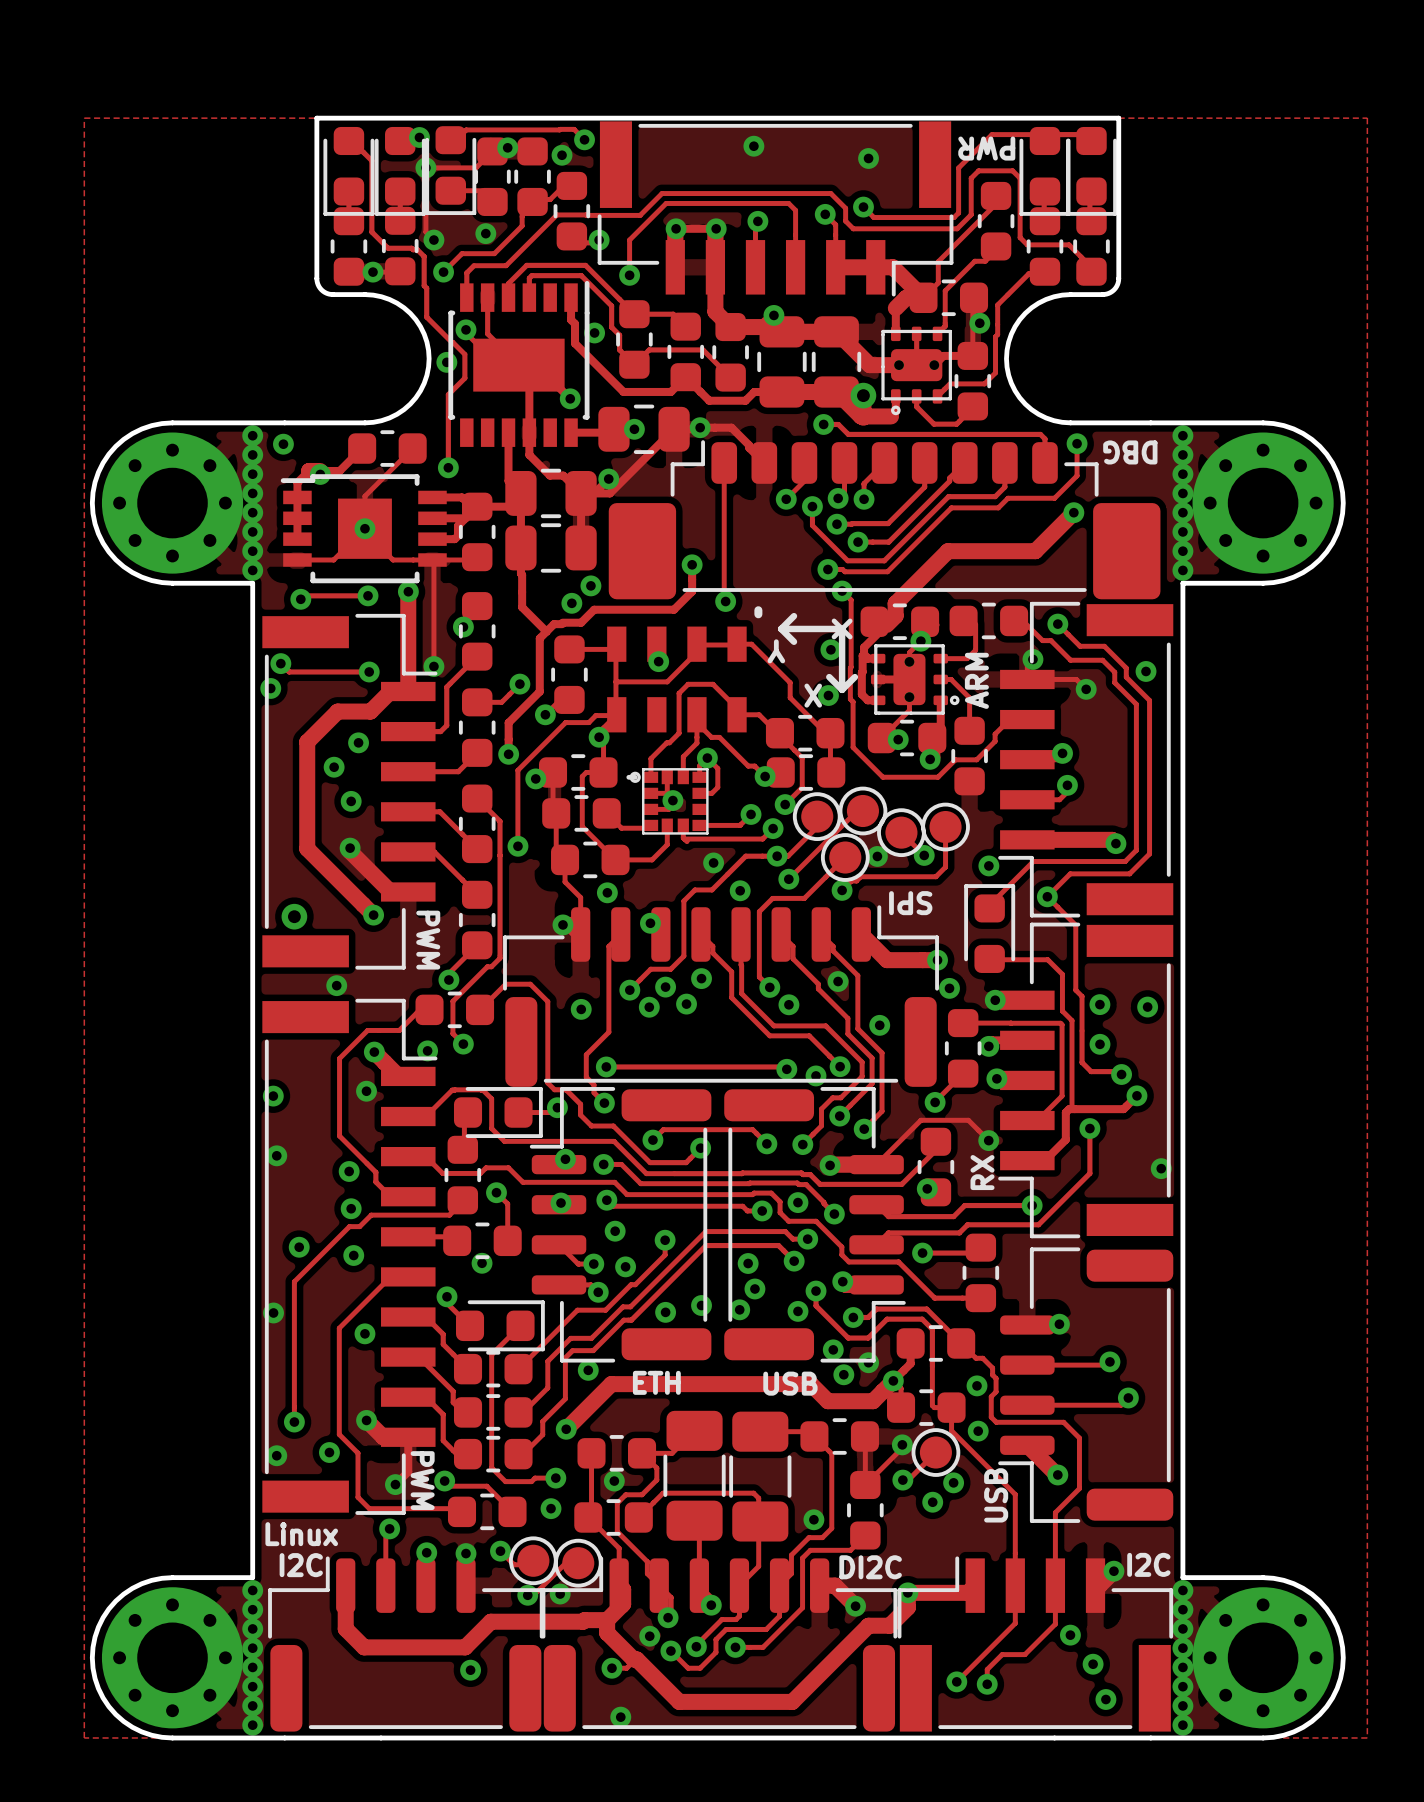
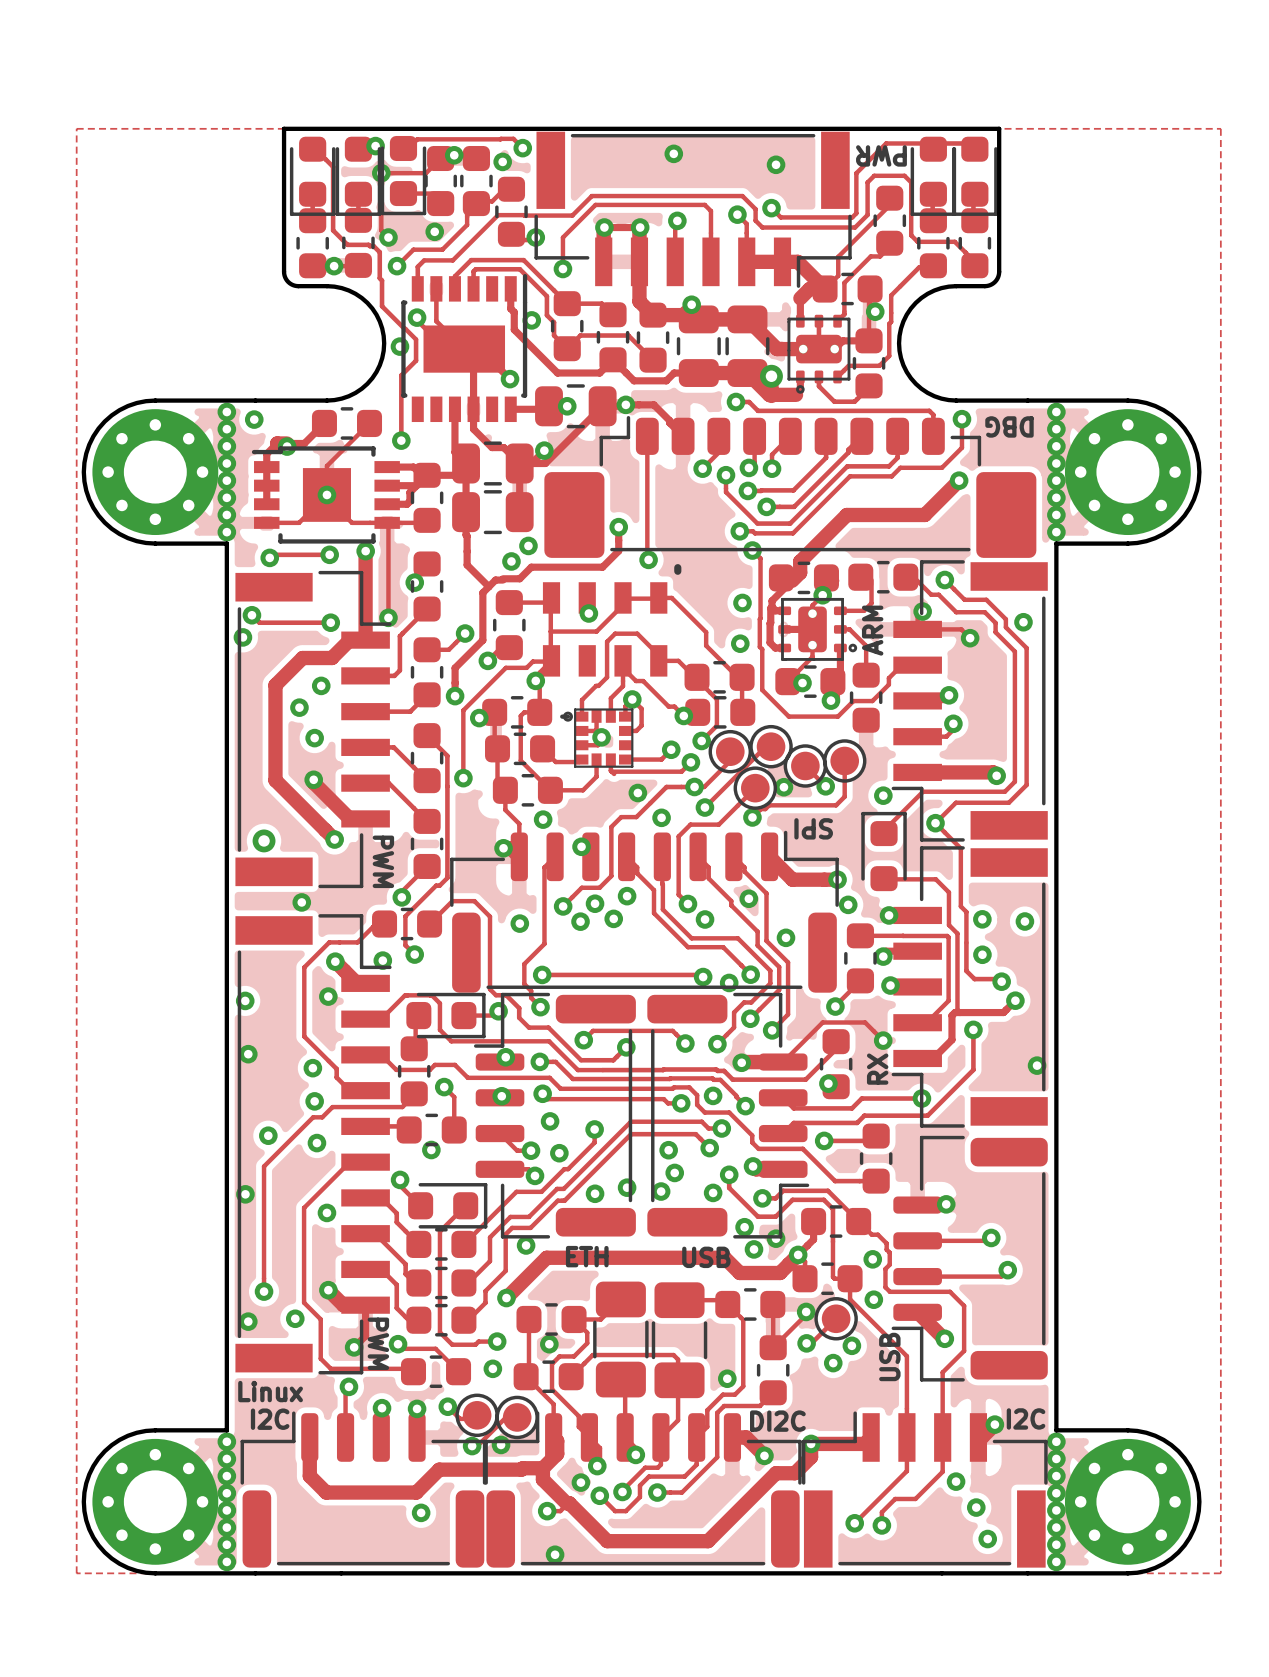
drawing: [777, 612, 859, 694] -> none

